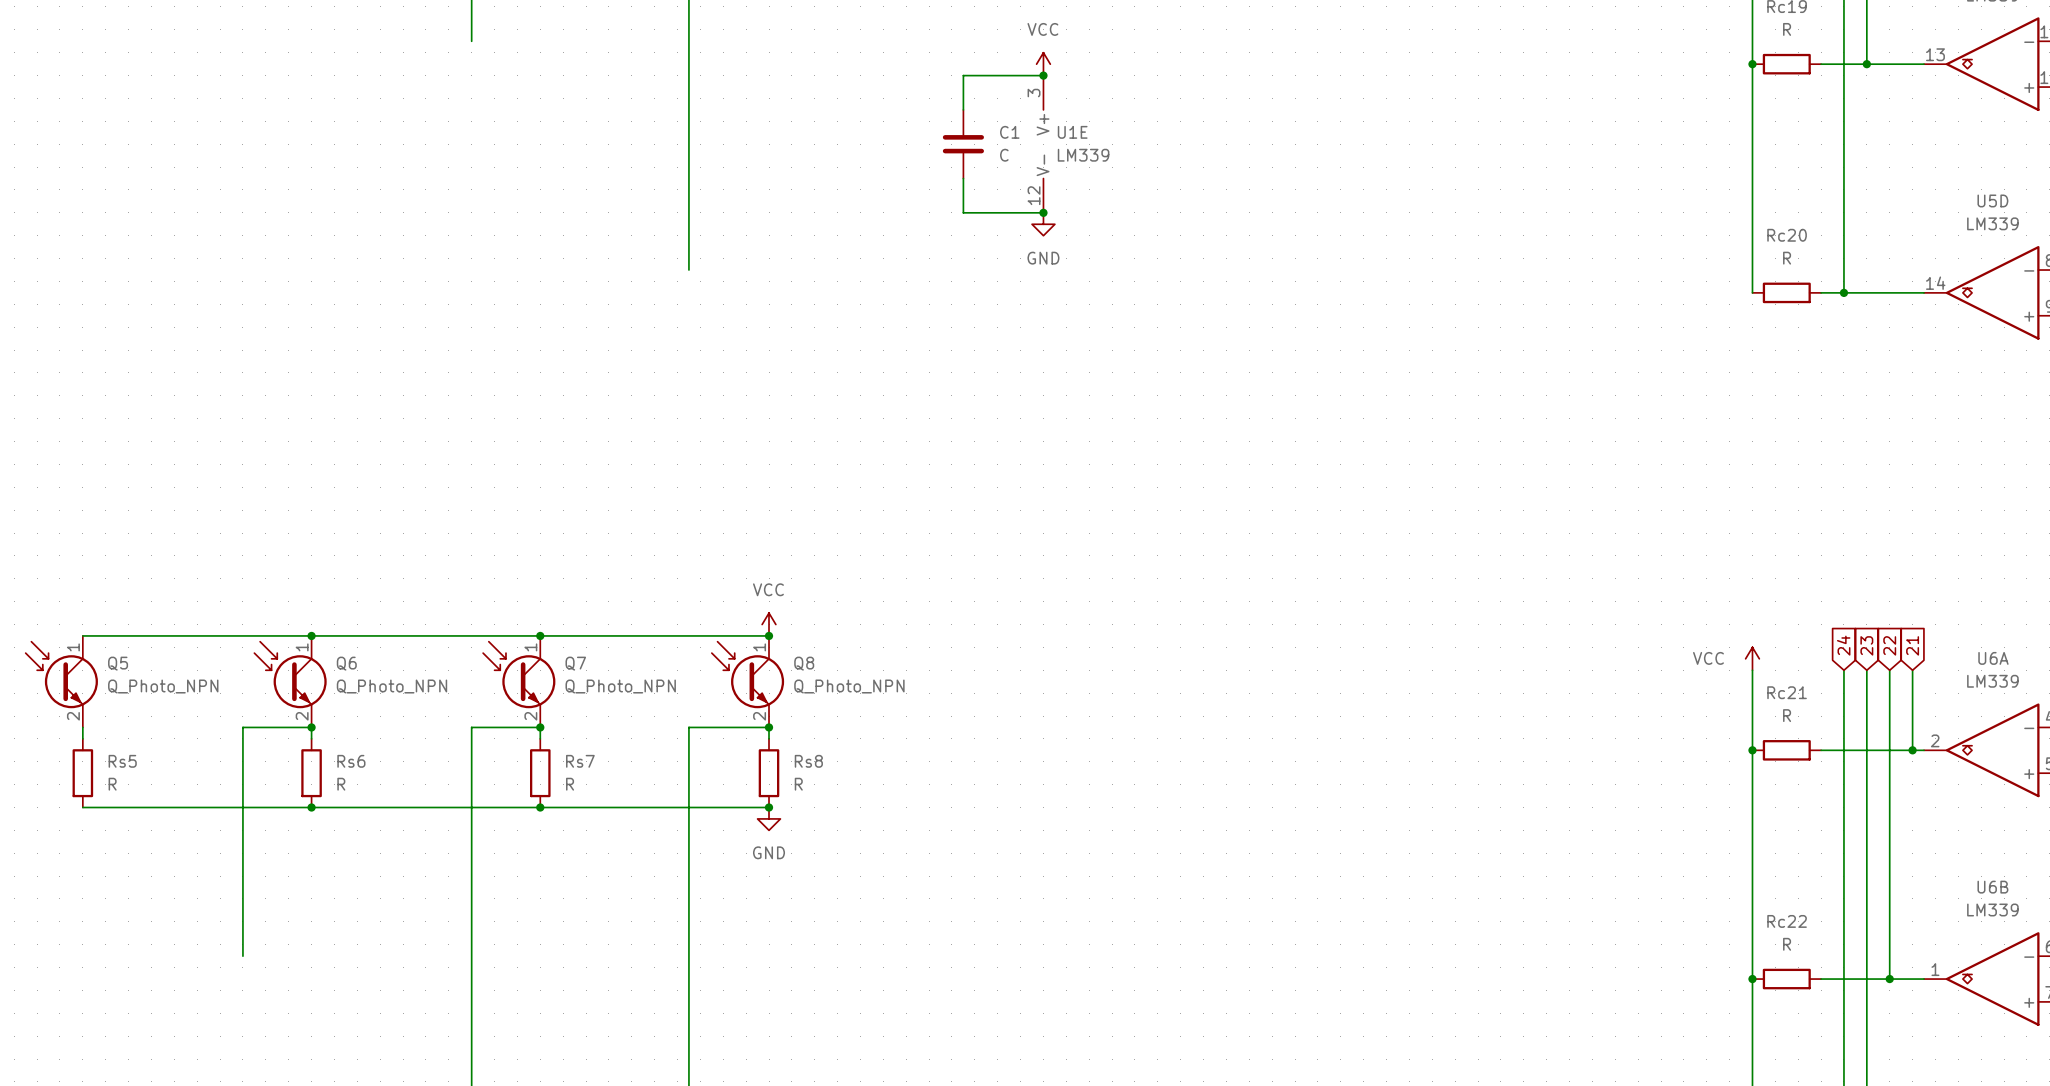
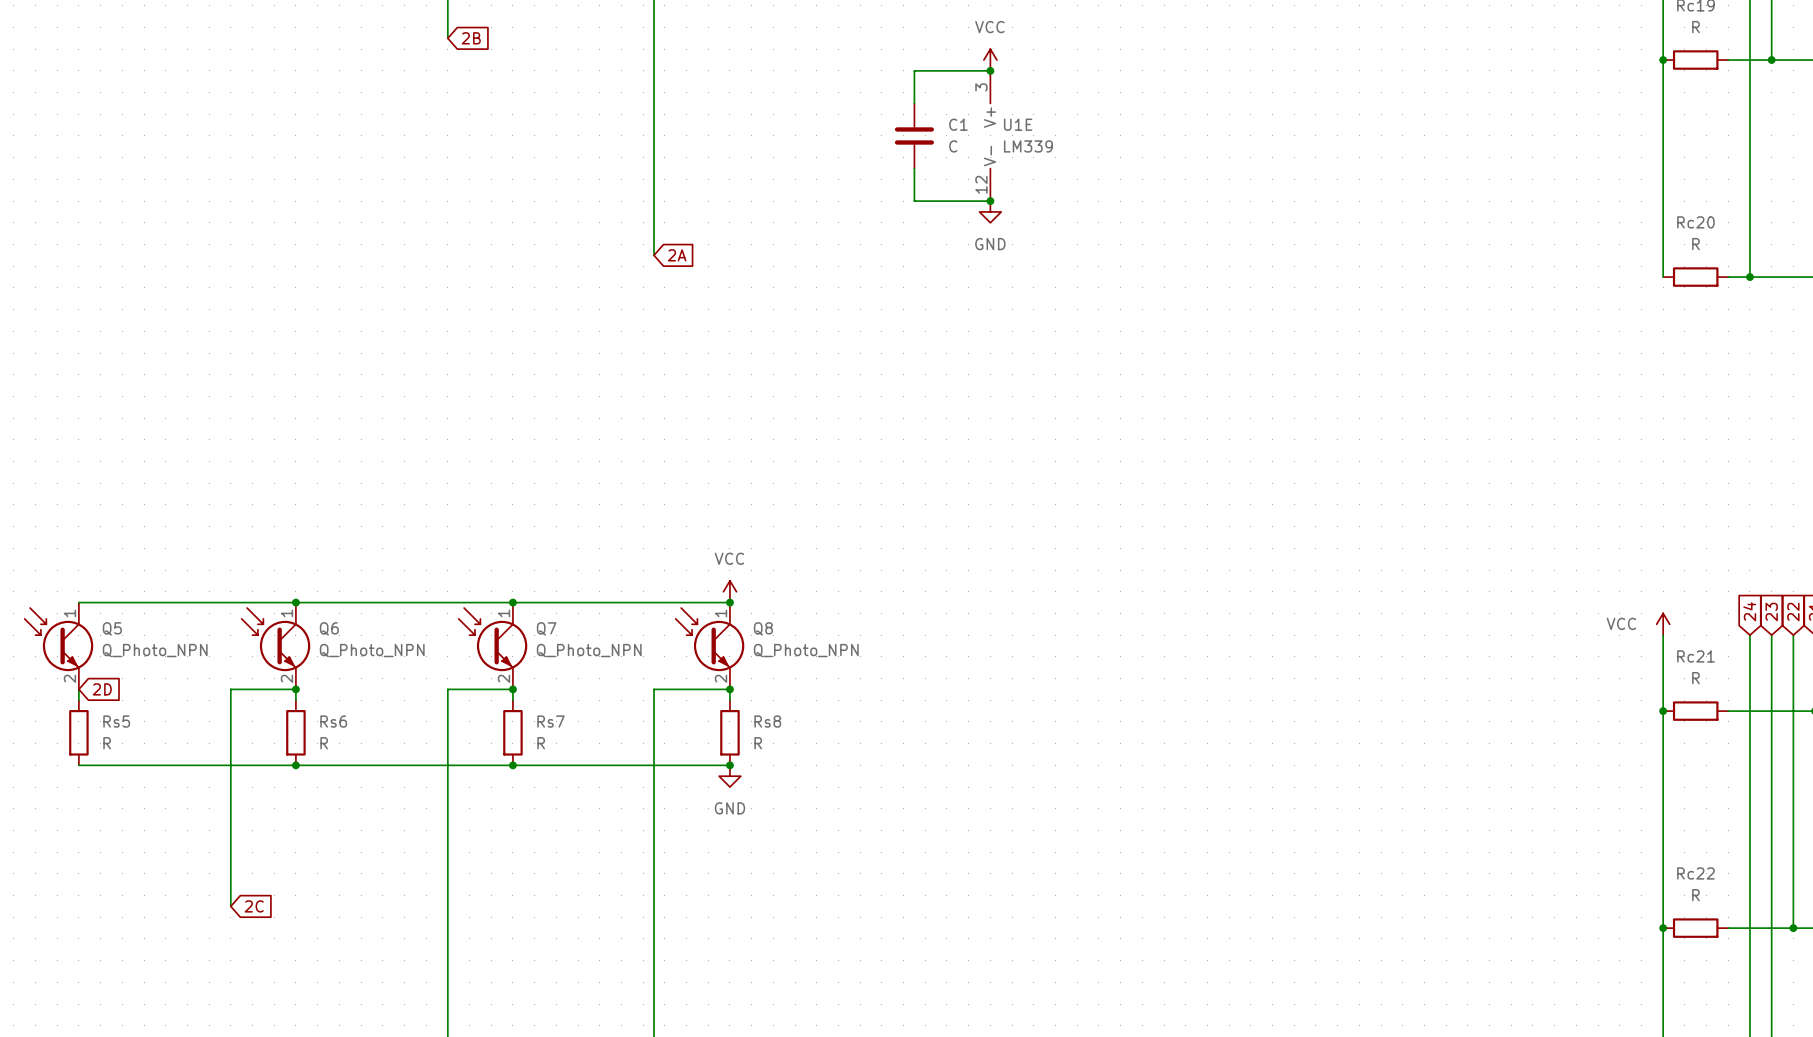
global label: none -> 2B (471, 38)
global label: none -> 2A (677, 255)
global label: none -> 2D (102, 689)
global label: none -> 2C (254, 906)

